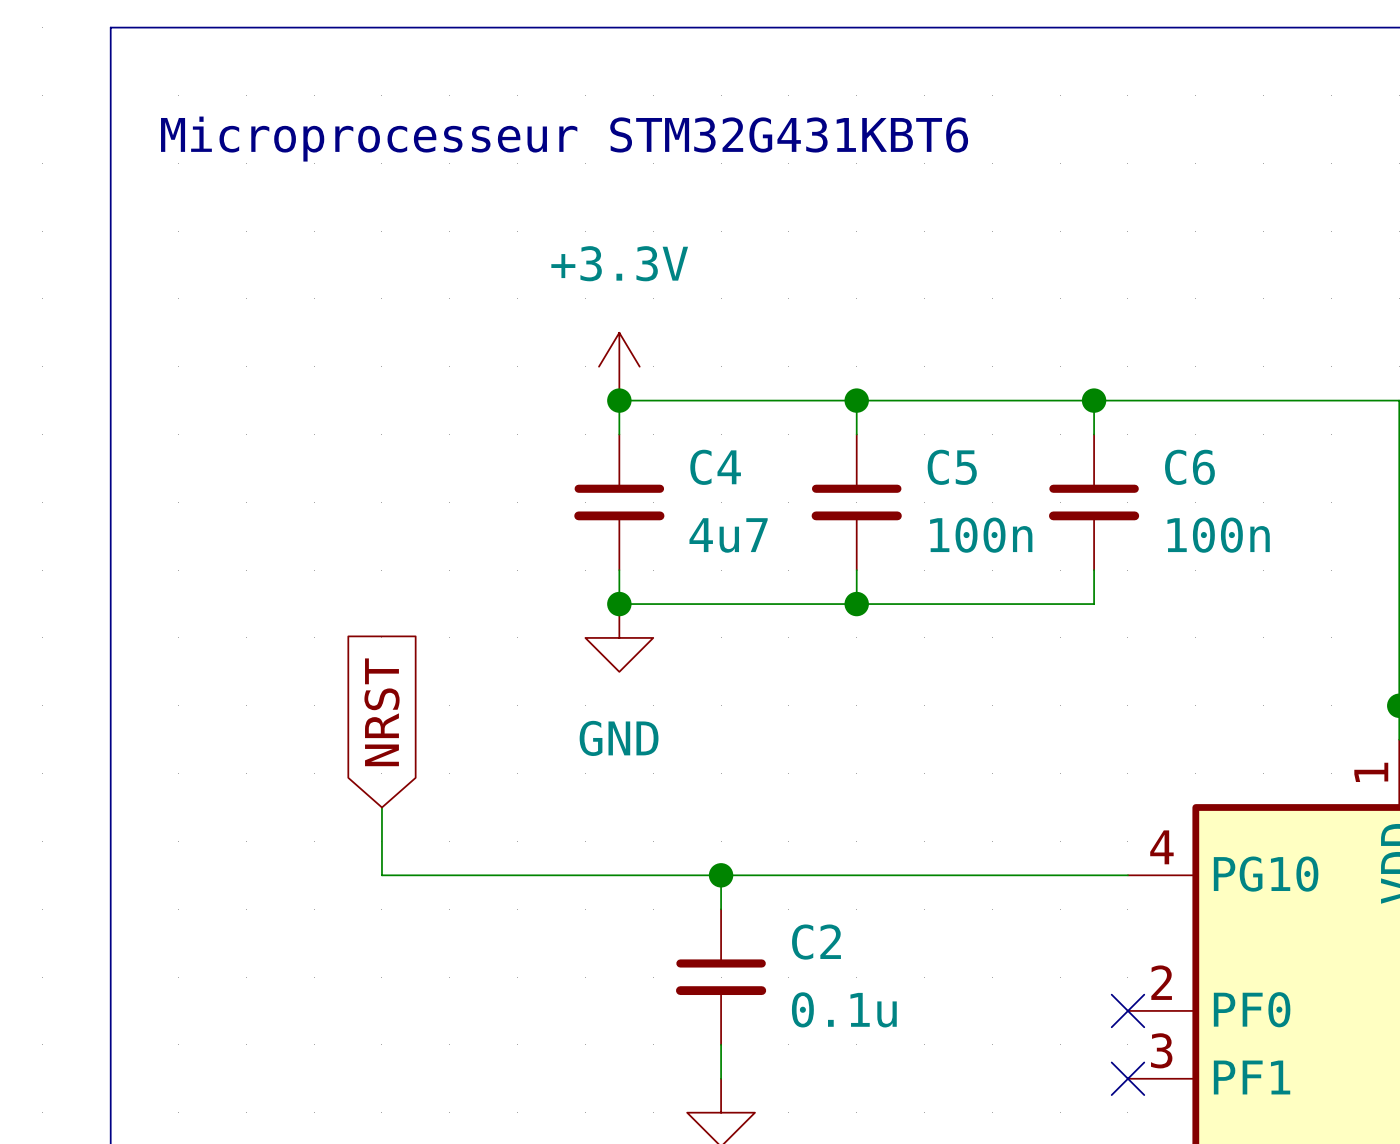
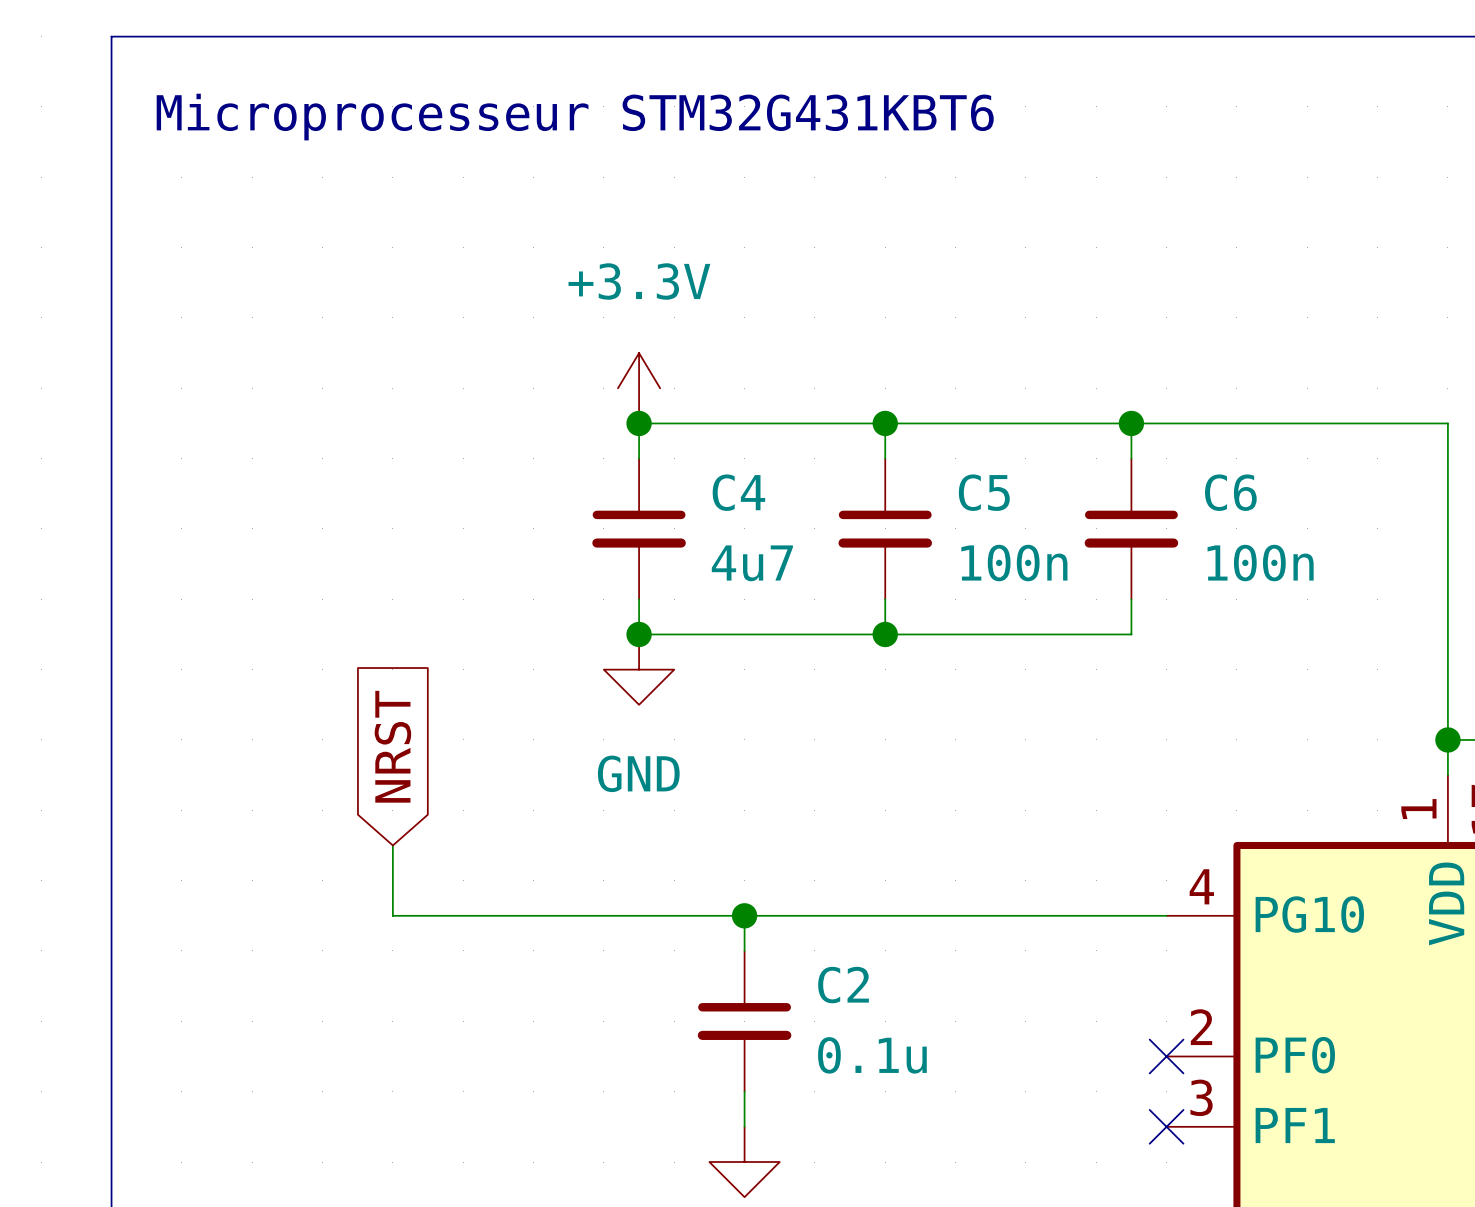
text position: Microprocesseur STM32G431KBT6 (564, 139) -> Microprocesseur STM32G431KBT6 (575, 117)

